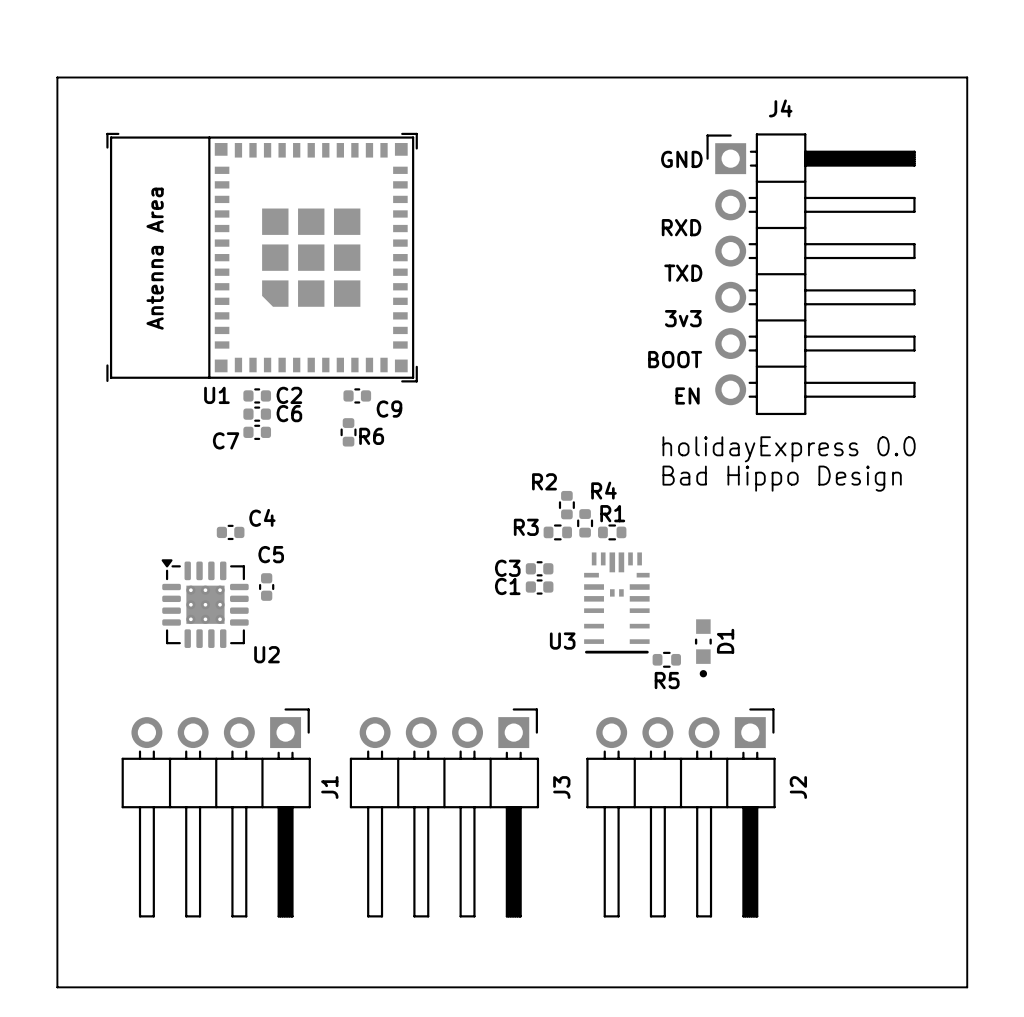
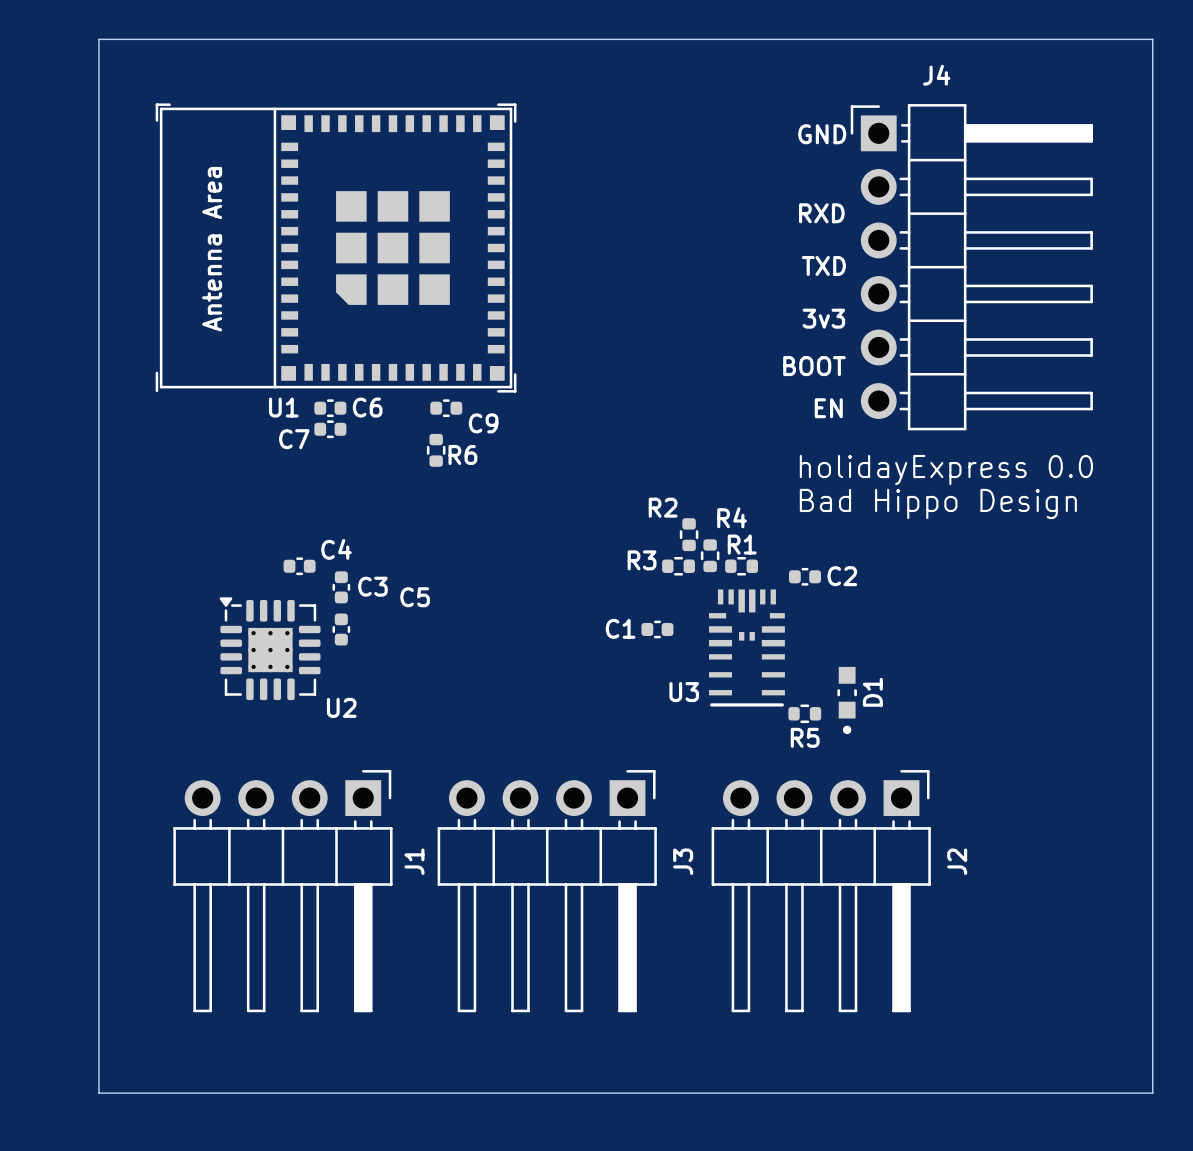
C2 name: C2 (289, 395) -> C6 (367, 407)
C6 name: C6 (289, 413) -> C7 (294, 439)
C7: (257, 432) -> none
C2: none -> (804, 576)
C5 name position: C5 (271, 554) -> C5 (415, 597)
C3 name position: C3 (507, 568) -> C3 (372, 586)
C3 rotation: 0° (539, 568) -> 90° clockwise (341, 587)
C3 position: (539, 568) -> (341, 587)

